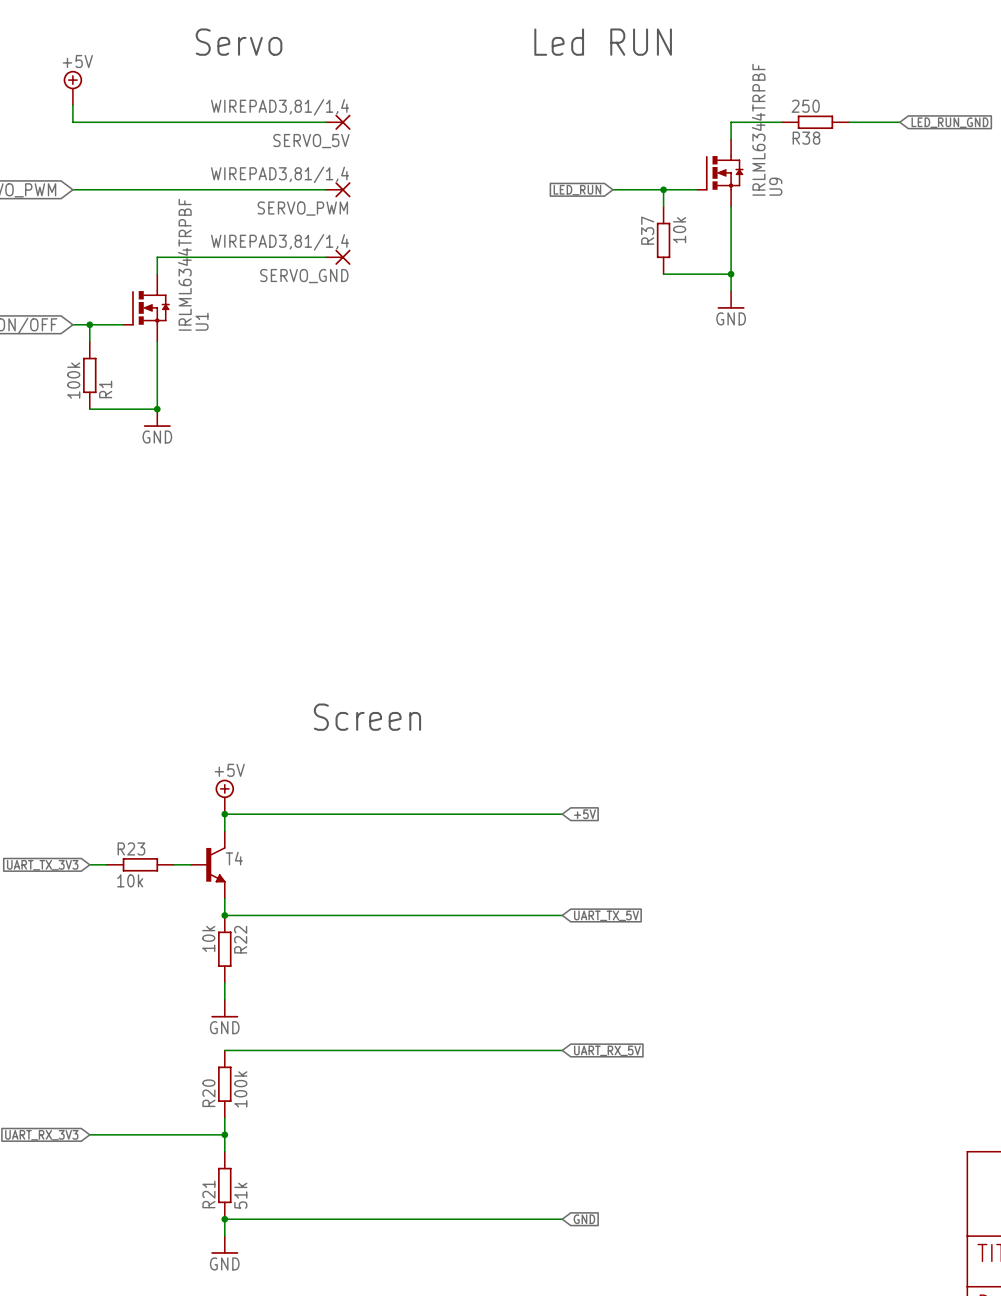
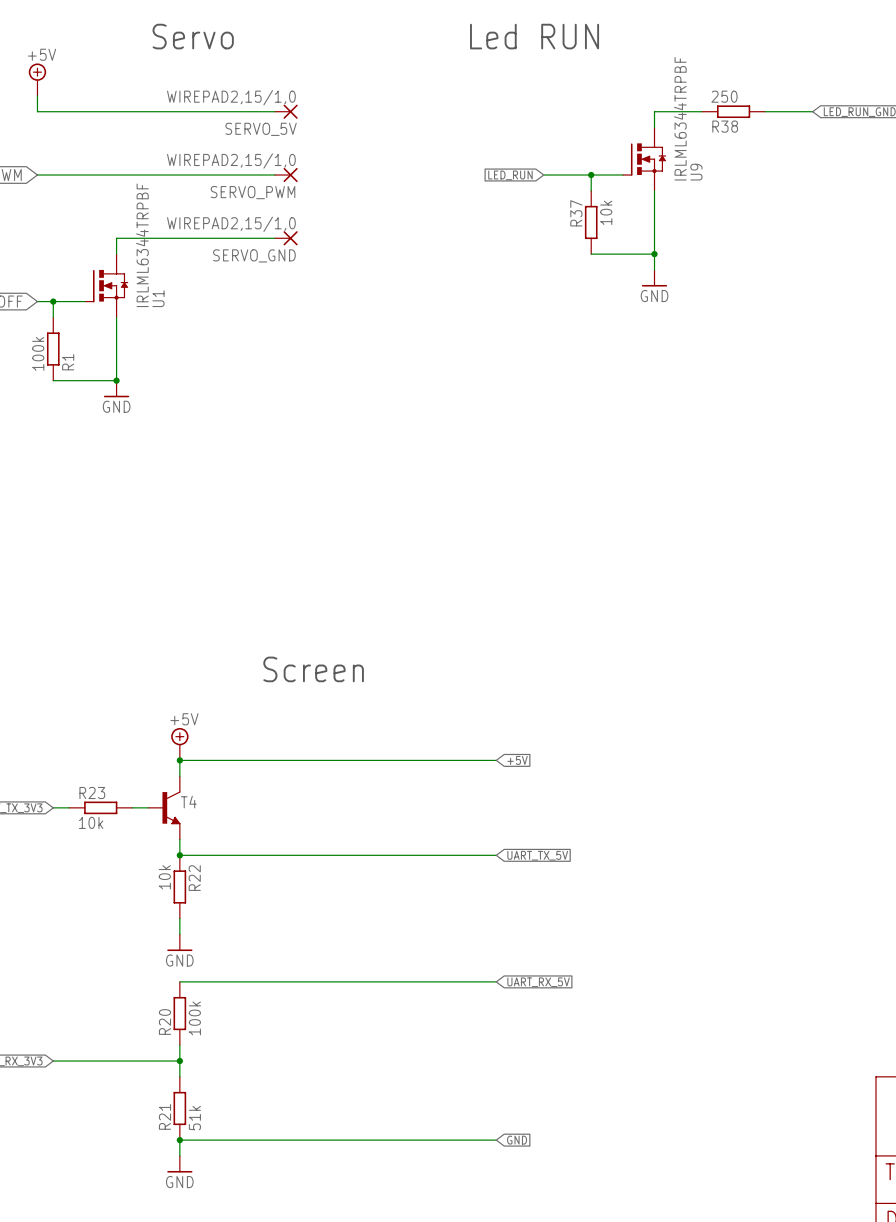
SERVO_5V value: WIREPAD3,81/1,4 (280, 107) -> WIREPAD2,15/1,0 (231, 97)
SERVO_PWM value: WIREPAD3,81/1,4 (280, 174) -> WIREPAD2,15/1,0 (231, 161)
SERVO_GND value: WIREPAD3,81/1,4 (280, 242) -> WIREPAD2,15/1,0 (231, 224)

